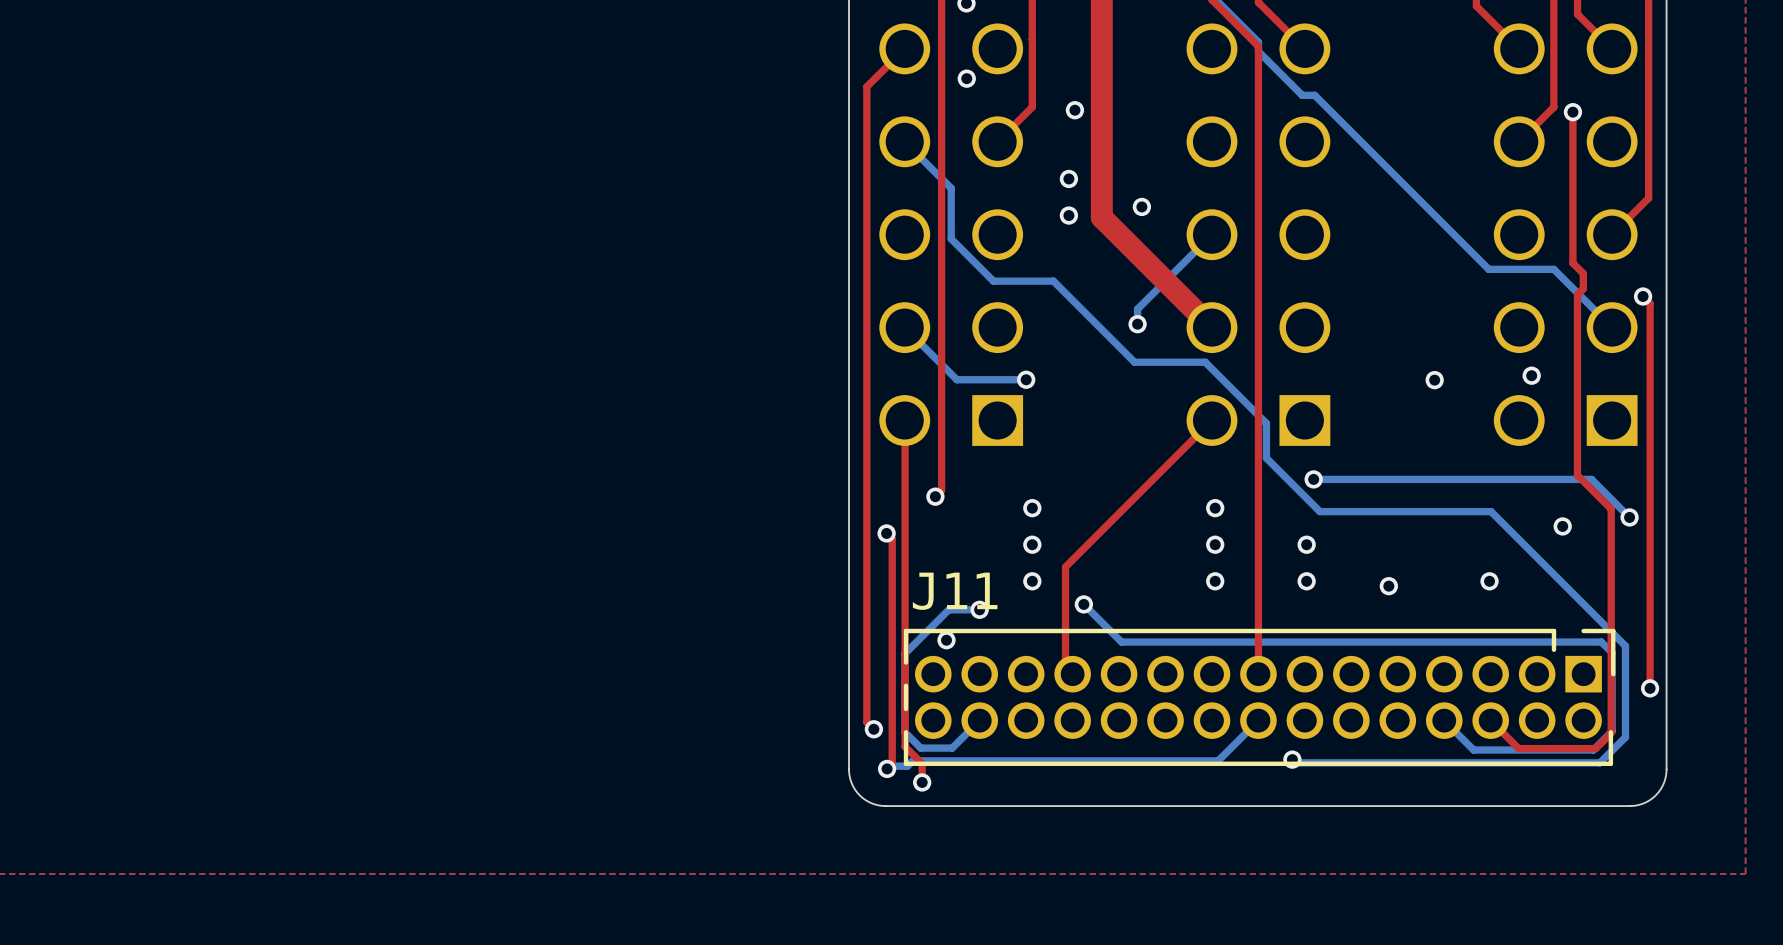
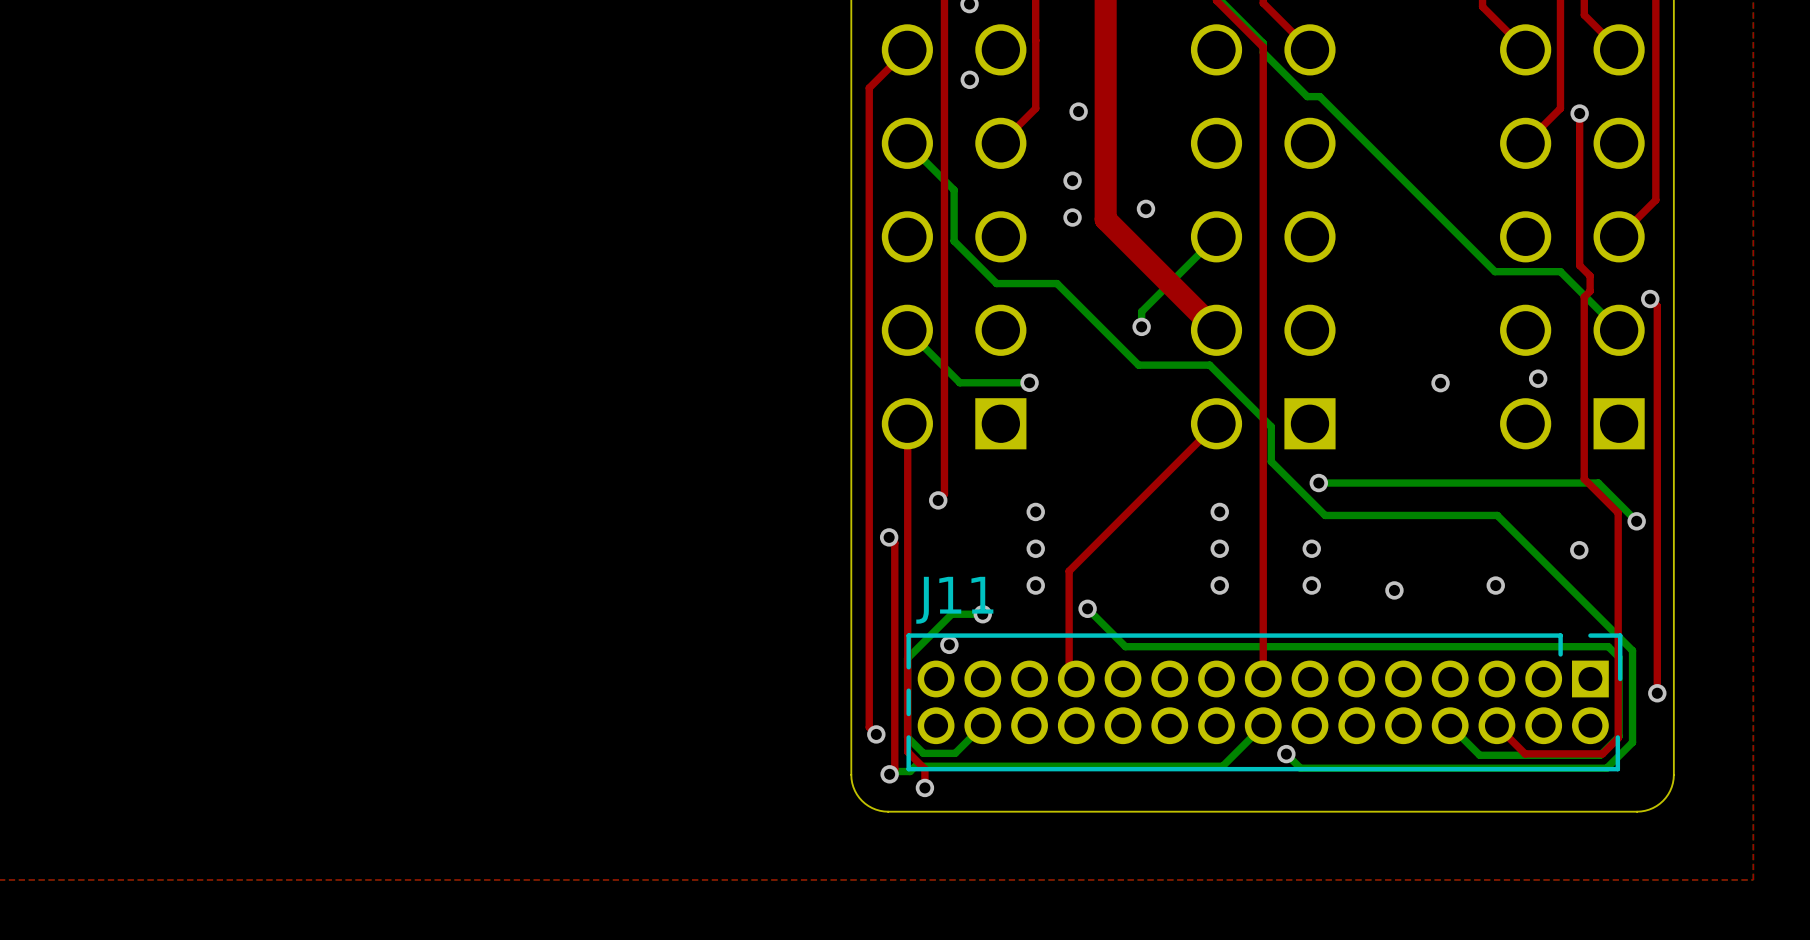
via position: (1562, 526) -> (1579, 550)
via position: (1292, 759) -> (1286, 754)

